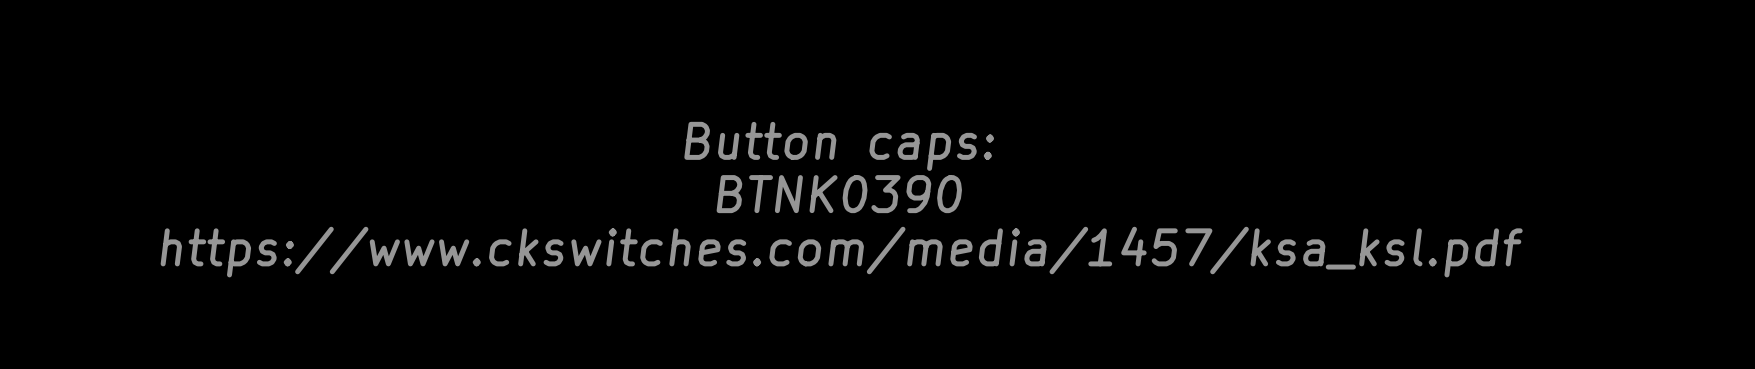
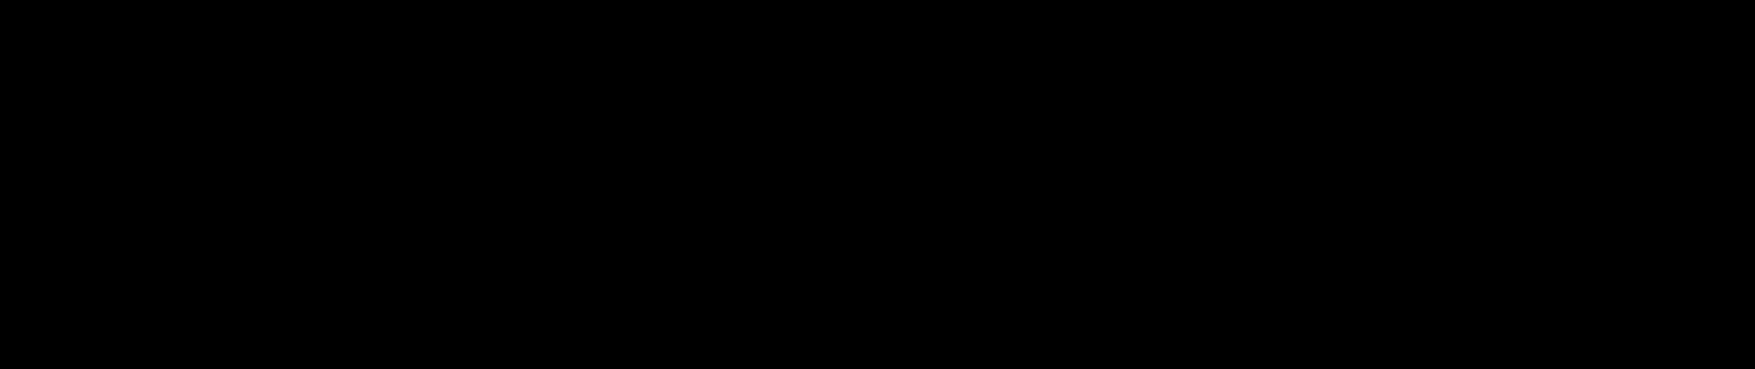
text: Button caps: (839, 146) -> none
text: BTNK0390 (839, 194) -> none
text: https://www.ckswitches.com/media/1457/ksa_ksl.pdf (841, 252) -> none

